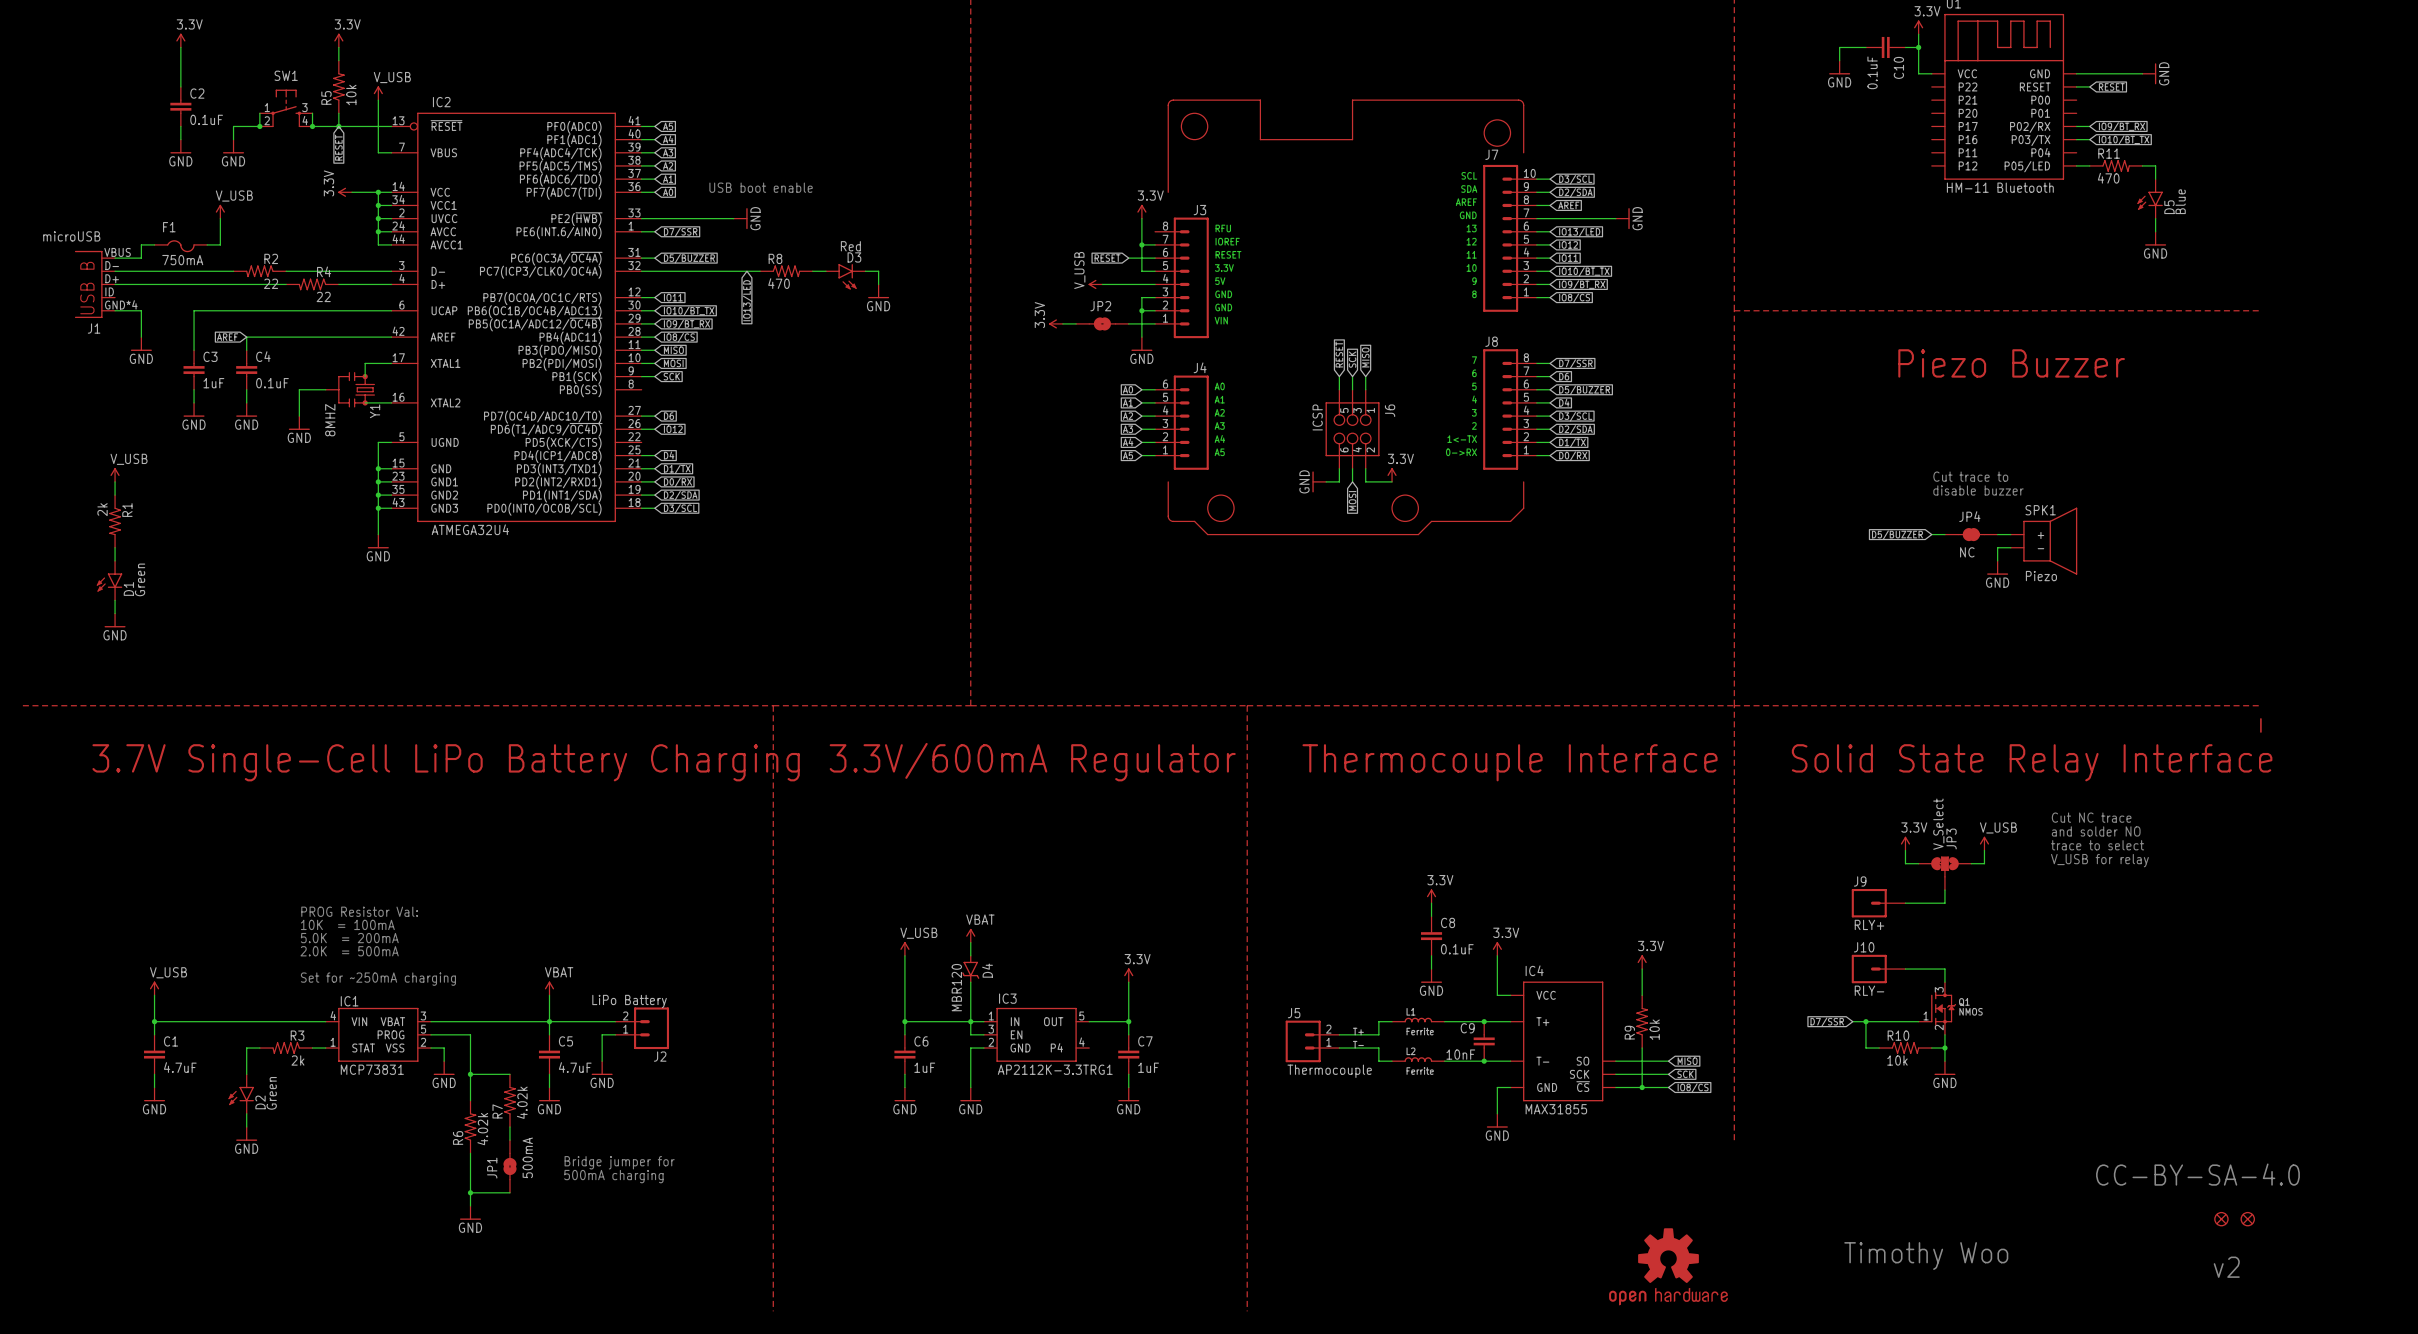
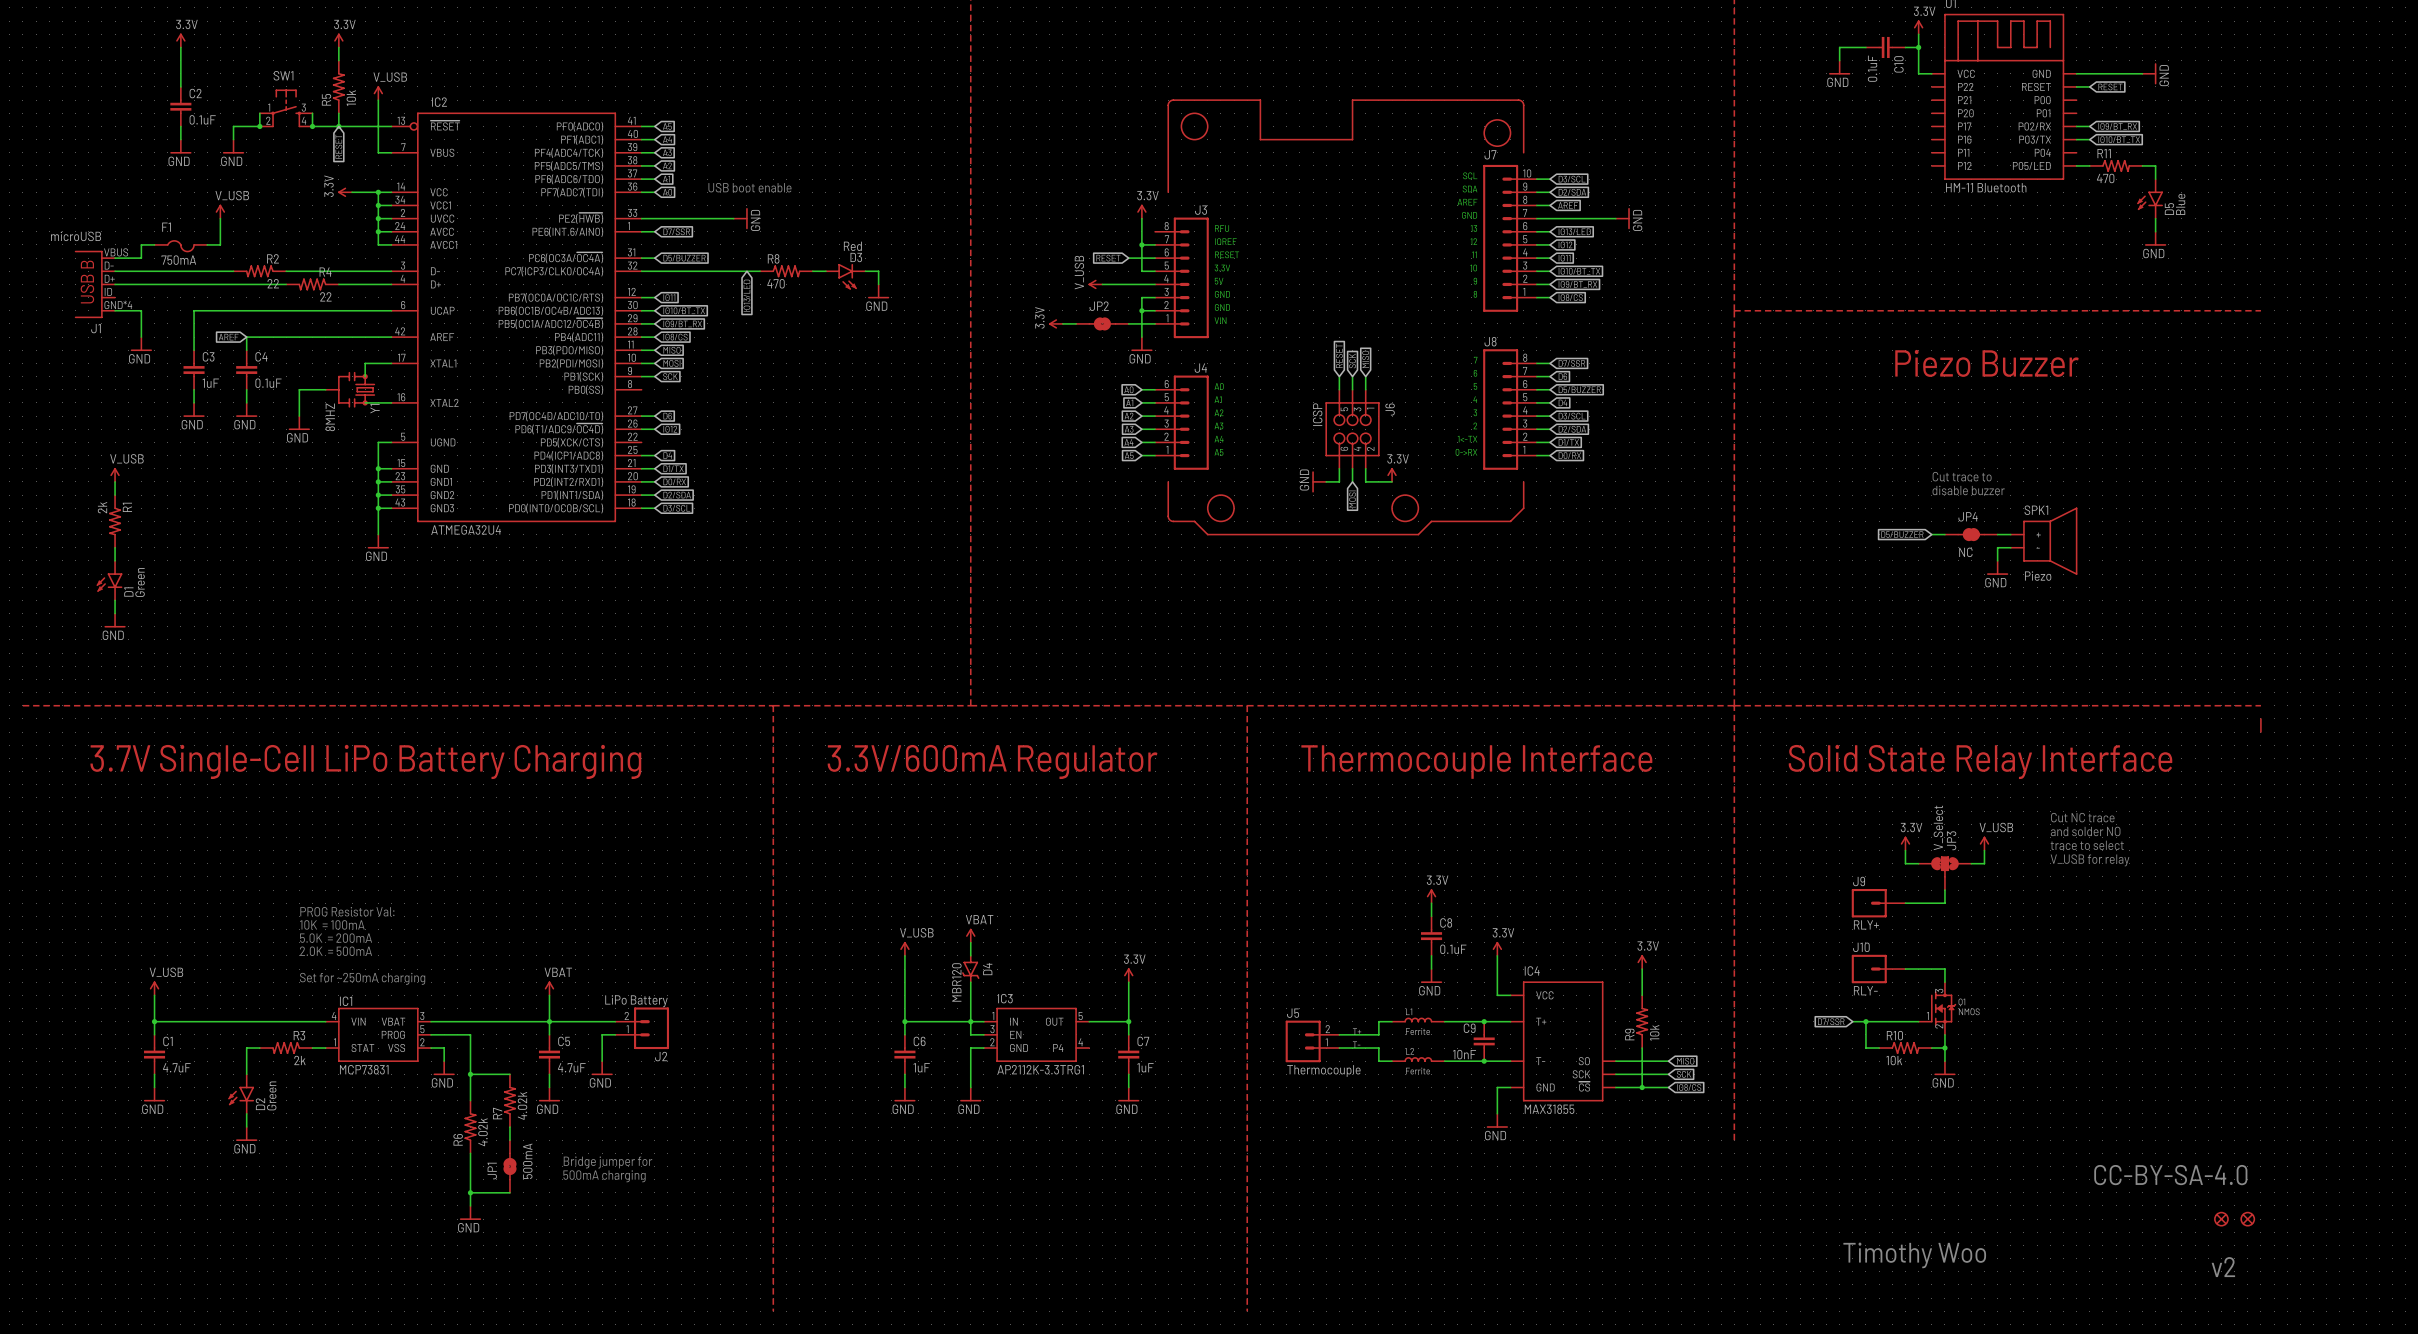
part: (1668, 1266) -> none

